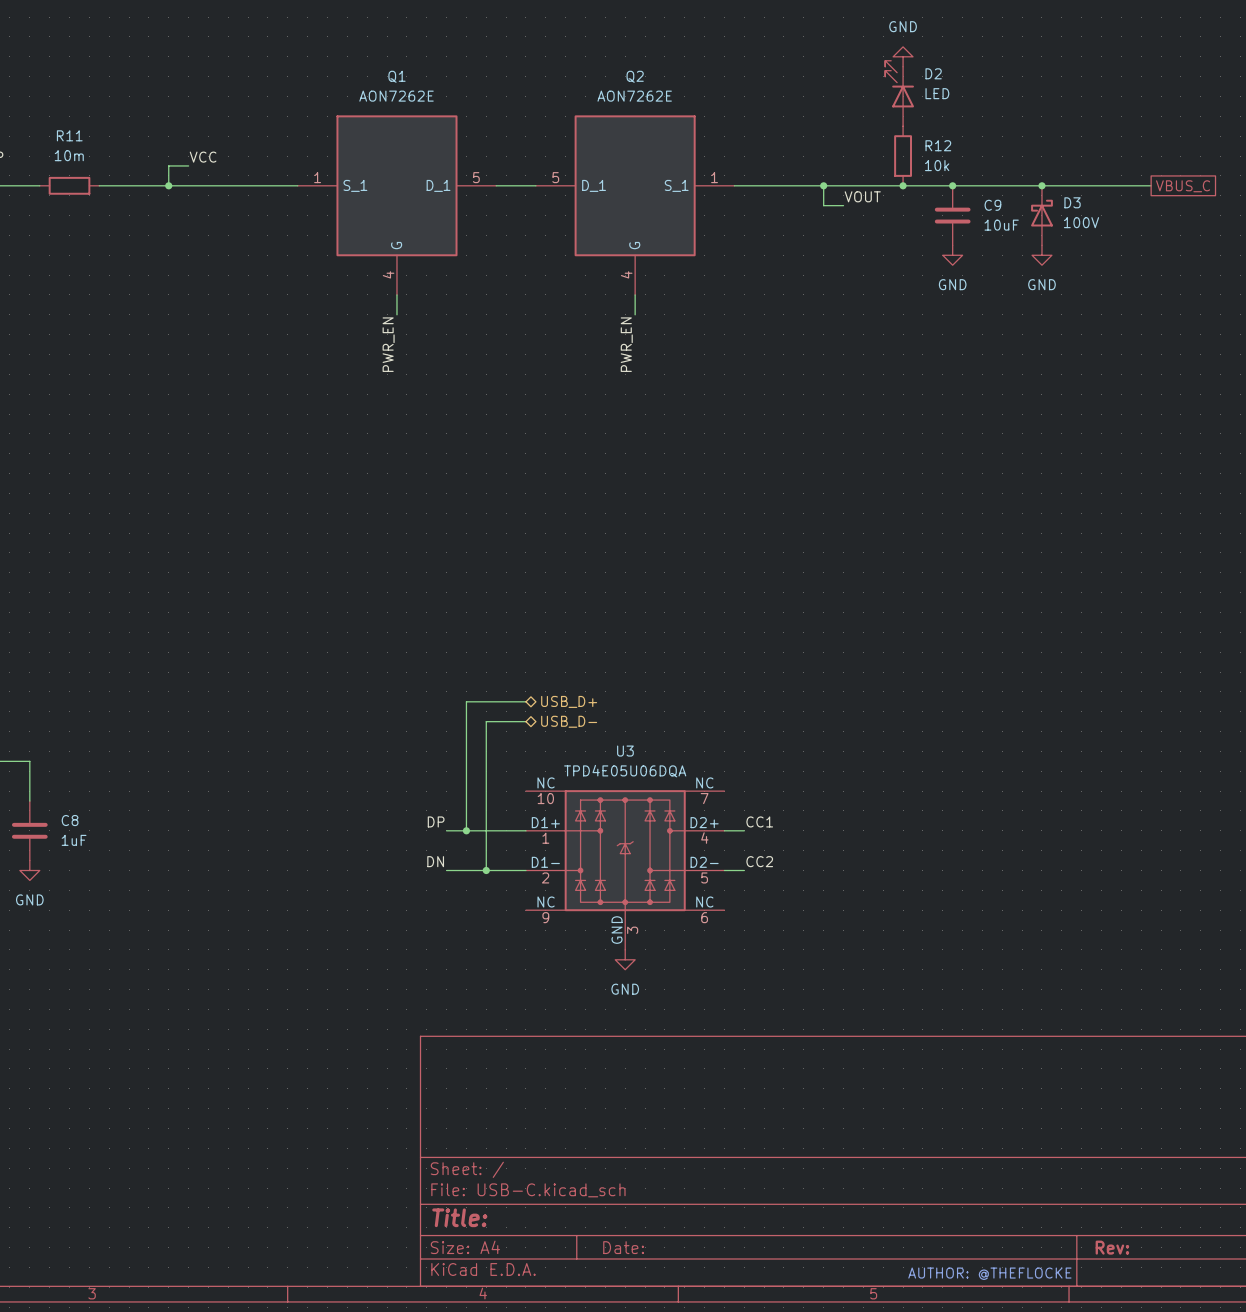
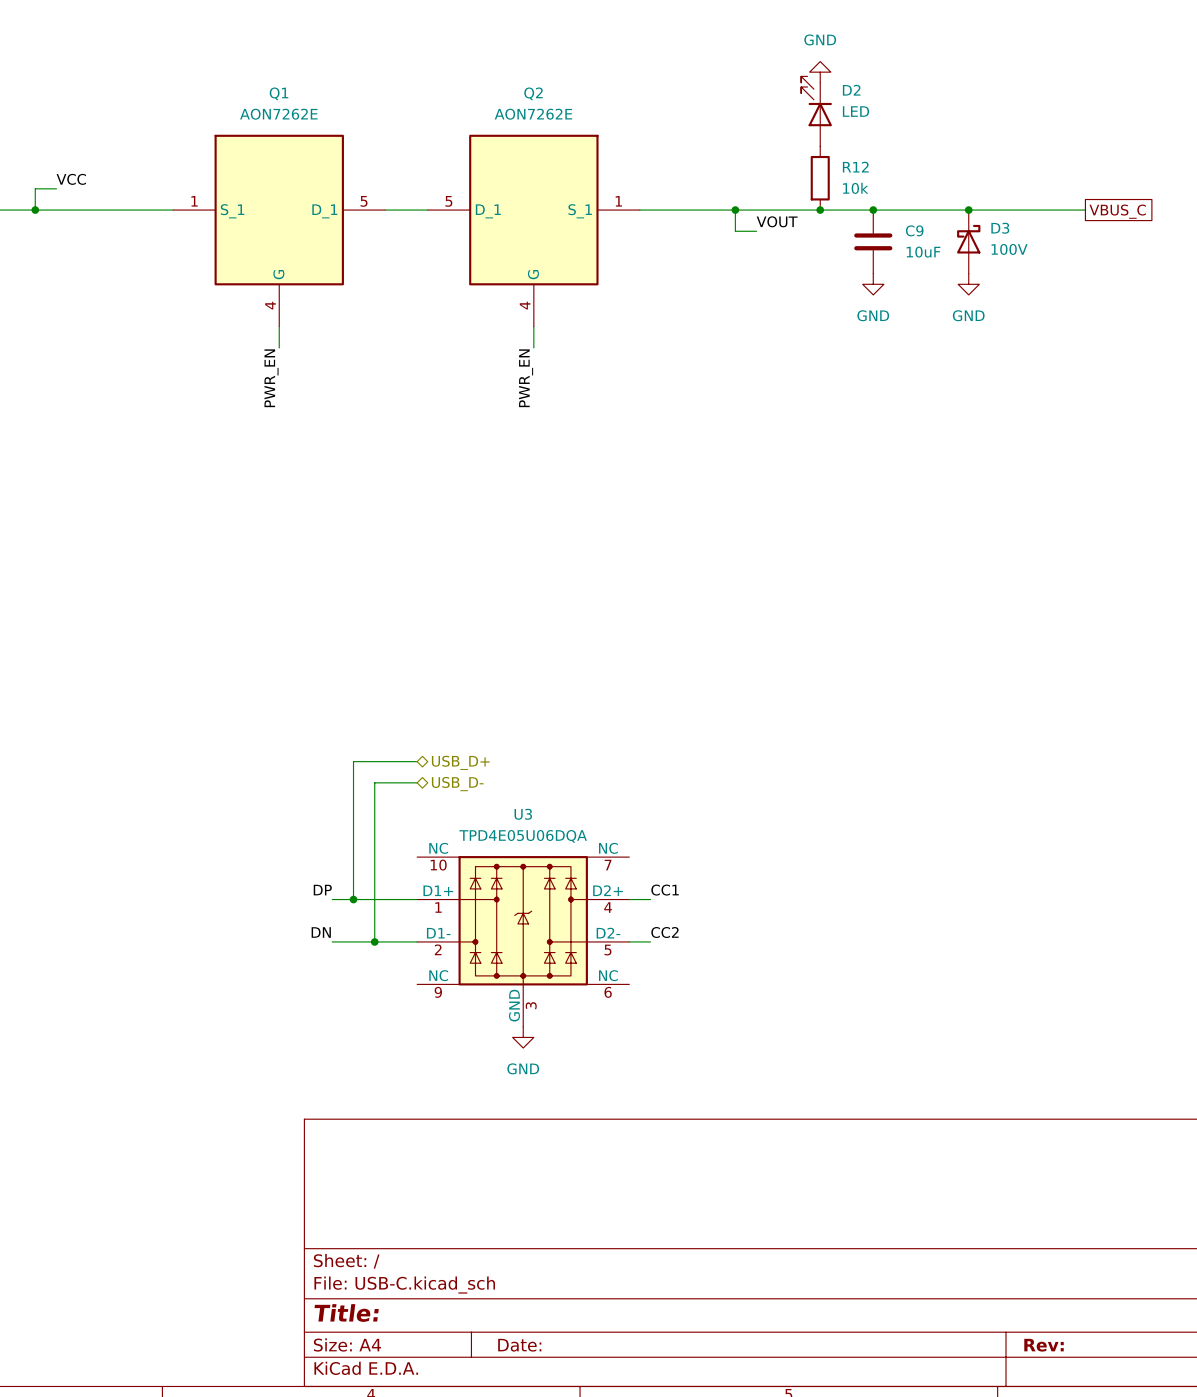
text: AUTHOR: @THEFLOCKE (989, 1273) -> none

